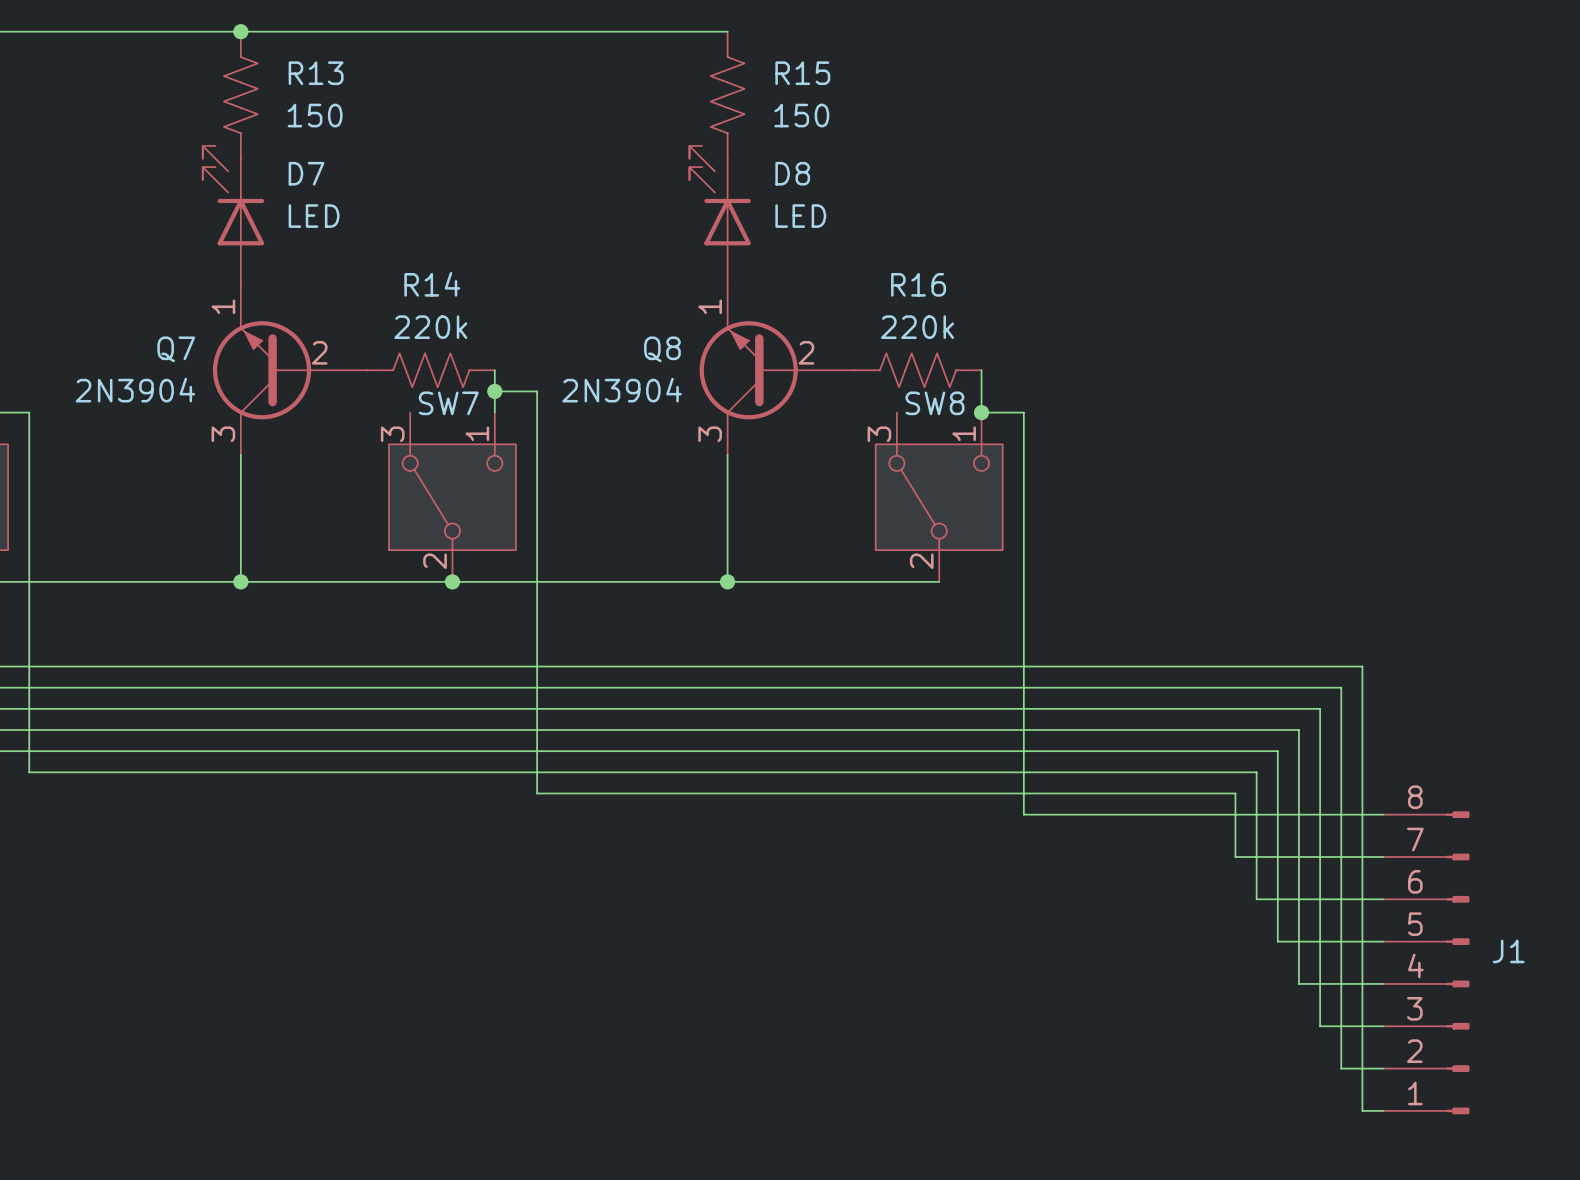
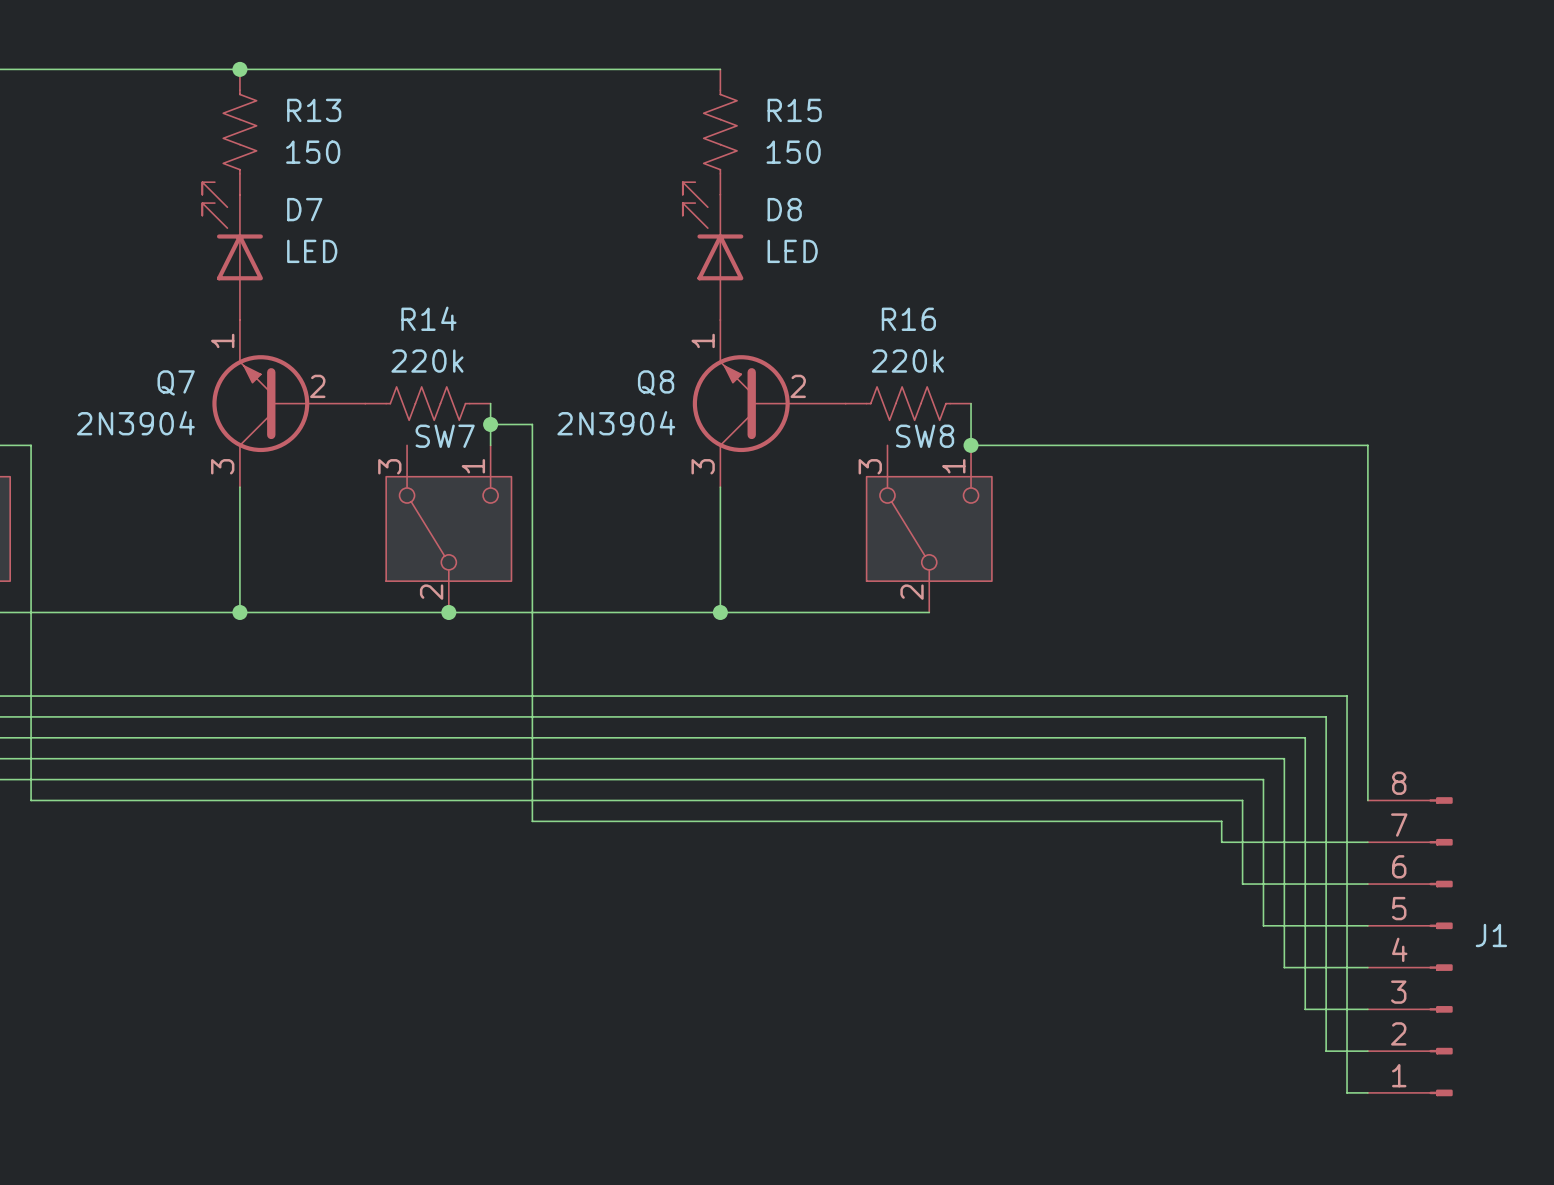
wire: (1023, 412) (1023, 814) (1235, 814) (1235, 856) (1256, 856) (1256, 899) (1277, 899) (1277, 941) (1298, 941) (1298, 983) (1320, 983) (1320, 1026) (1341, 1026) (1341, 1068) (1362, 1068) (1362, 1110) (1383, 1110) -> (1012, 445) (1367, 445) (1367, 800)
J1 position: (1426, 962) -> (1410, 946)

